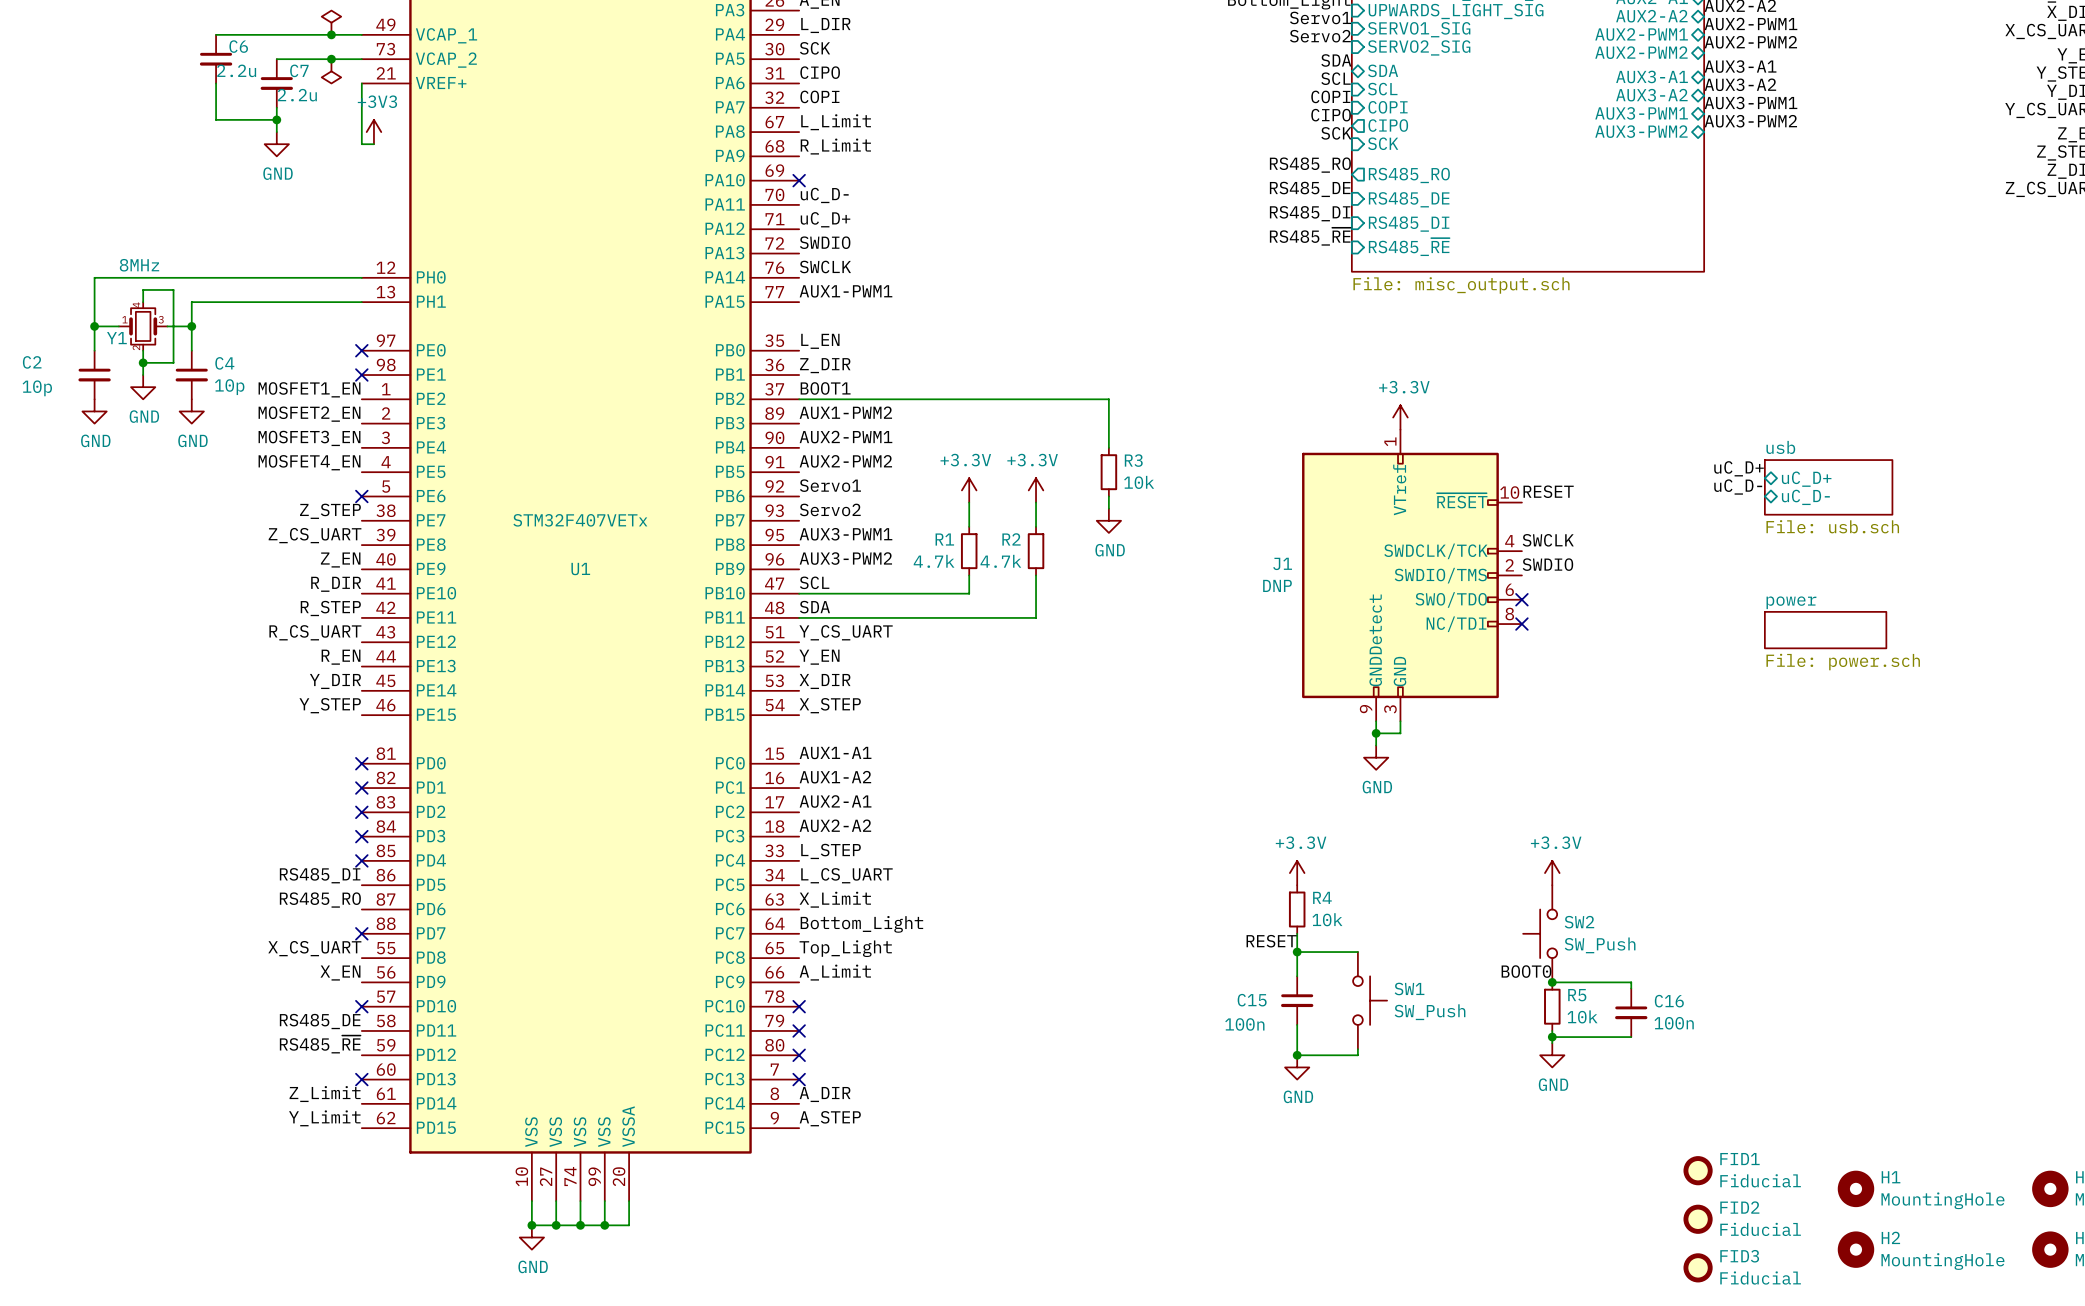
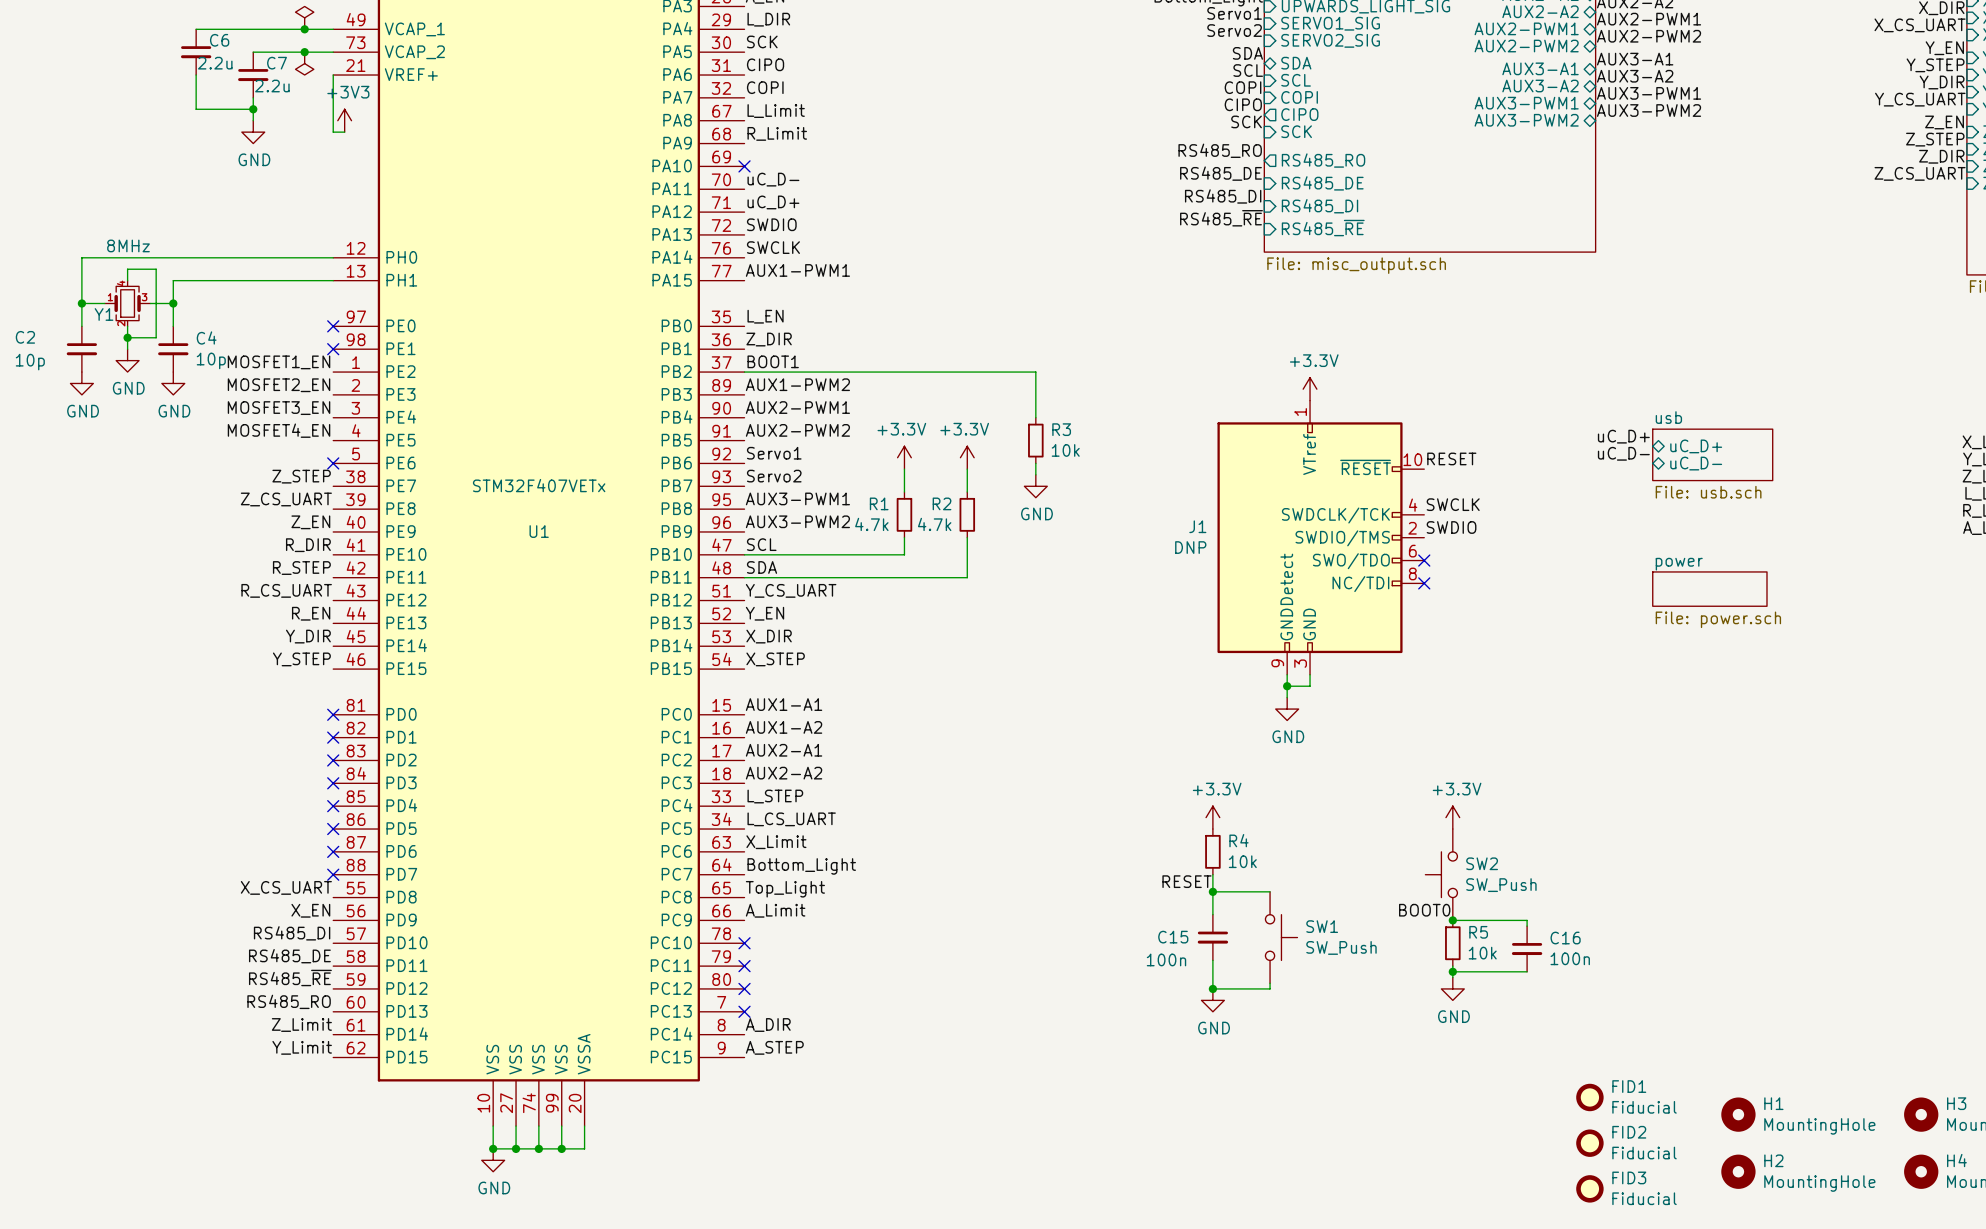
label position: RS485_DI (320, 875) -> RS485_DI (292, 933)
no-connect mark: none -> (333, 829)
label position: RS485_RO (320, 900) -> RS485_RO (289, 1001)
no-connect mark: none -> (333, 851)
no-connect mark: (361, 1006) -> none
no-connect mark: (361, 1079) -> none

